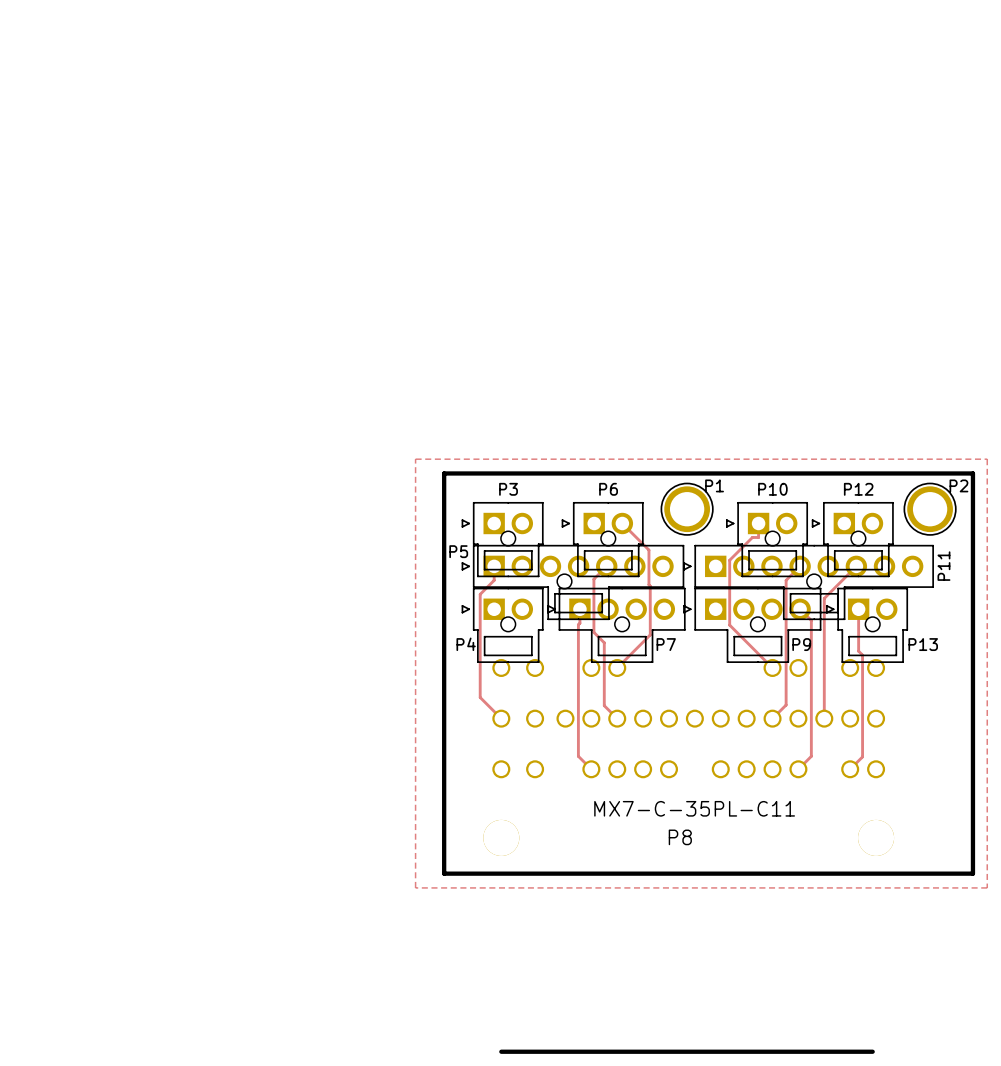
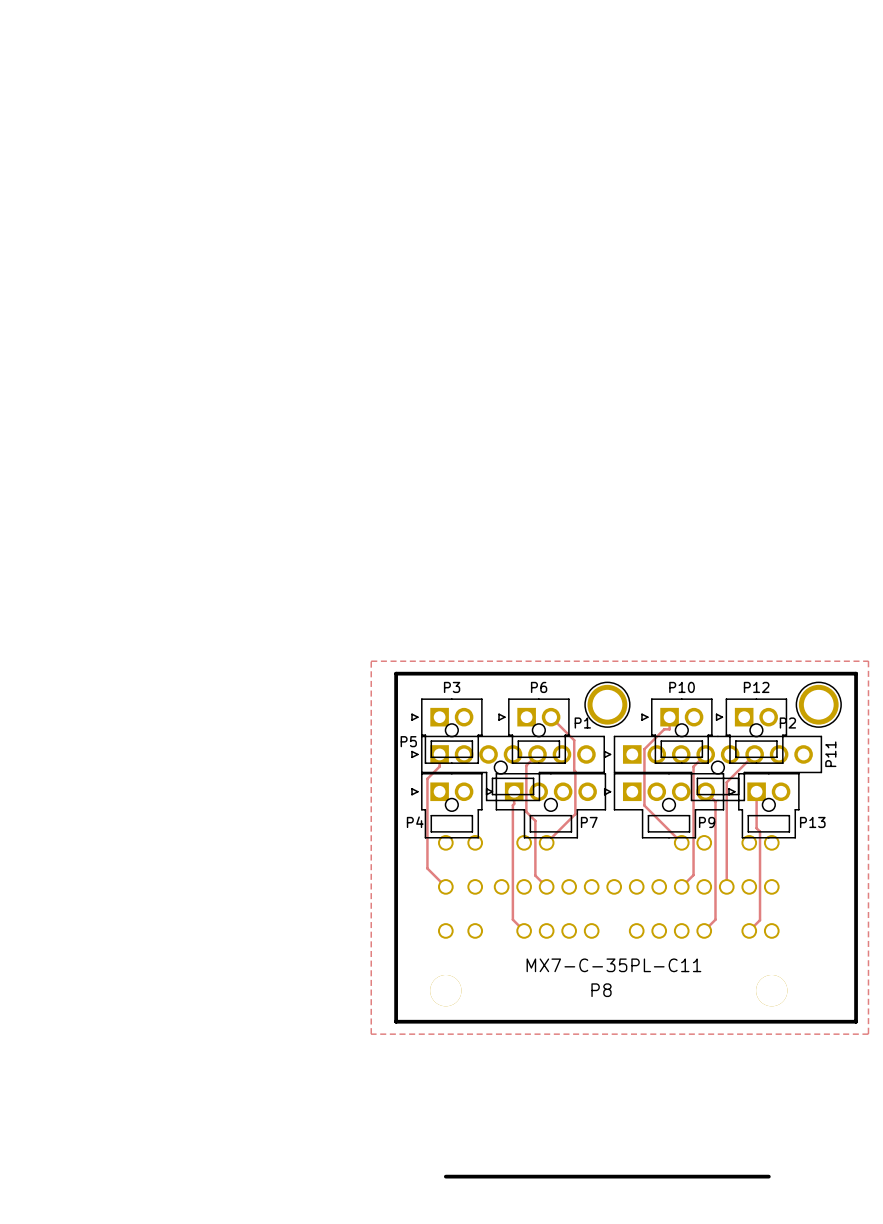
P1 name position: P1 (714, 485) -> P1 (582, 723)
P2 name position: P2 (958, 485) -> P2 (787, 723)

